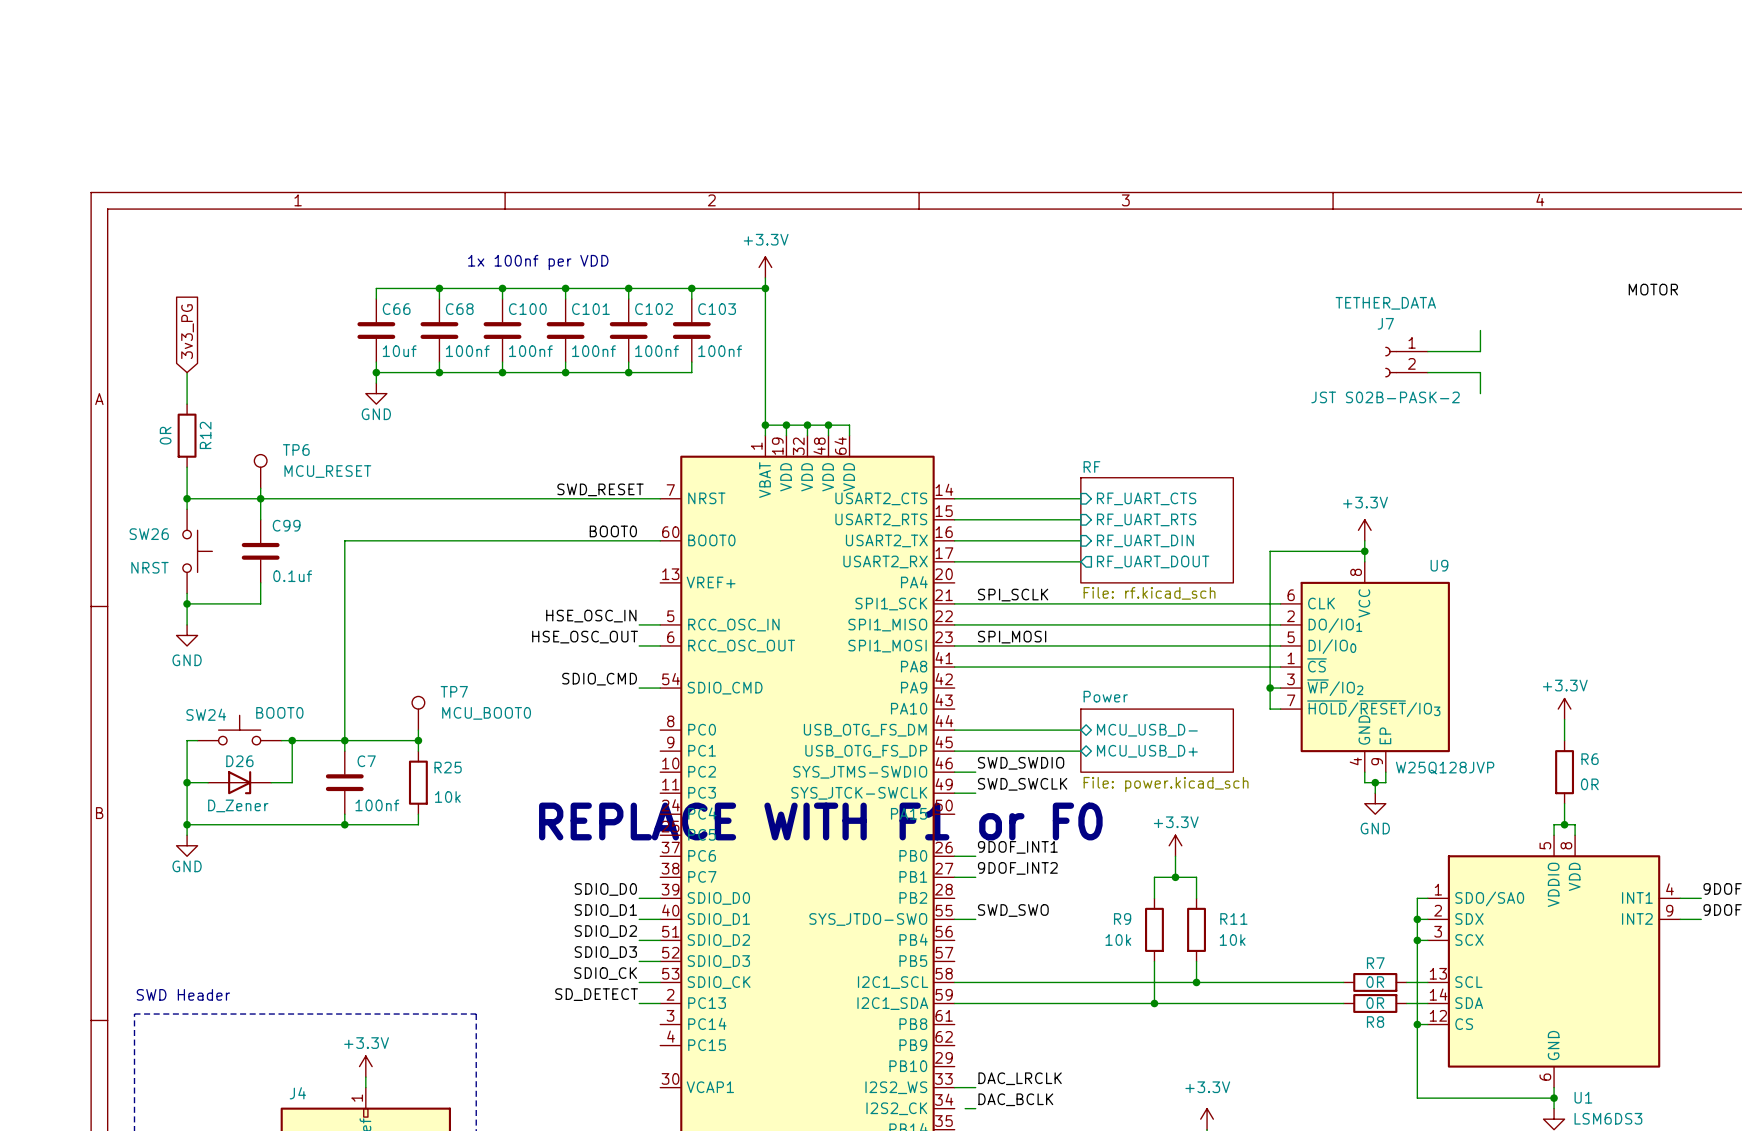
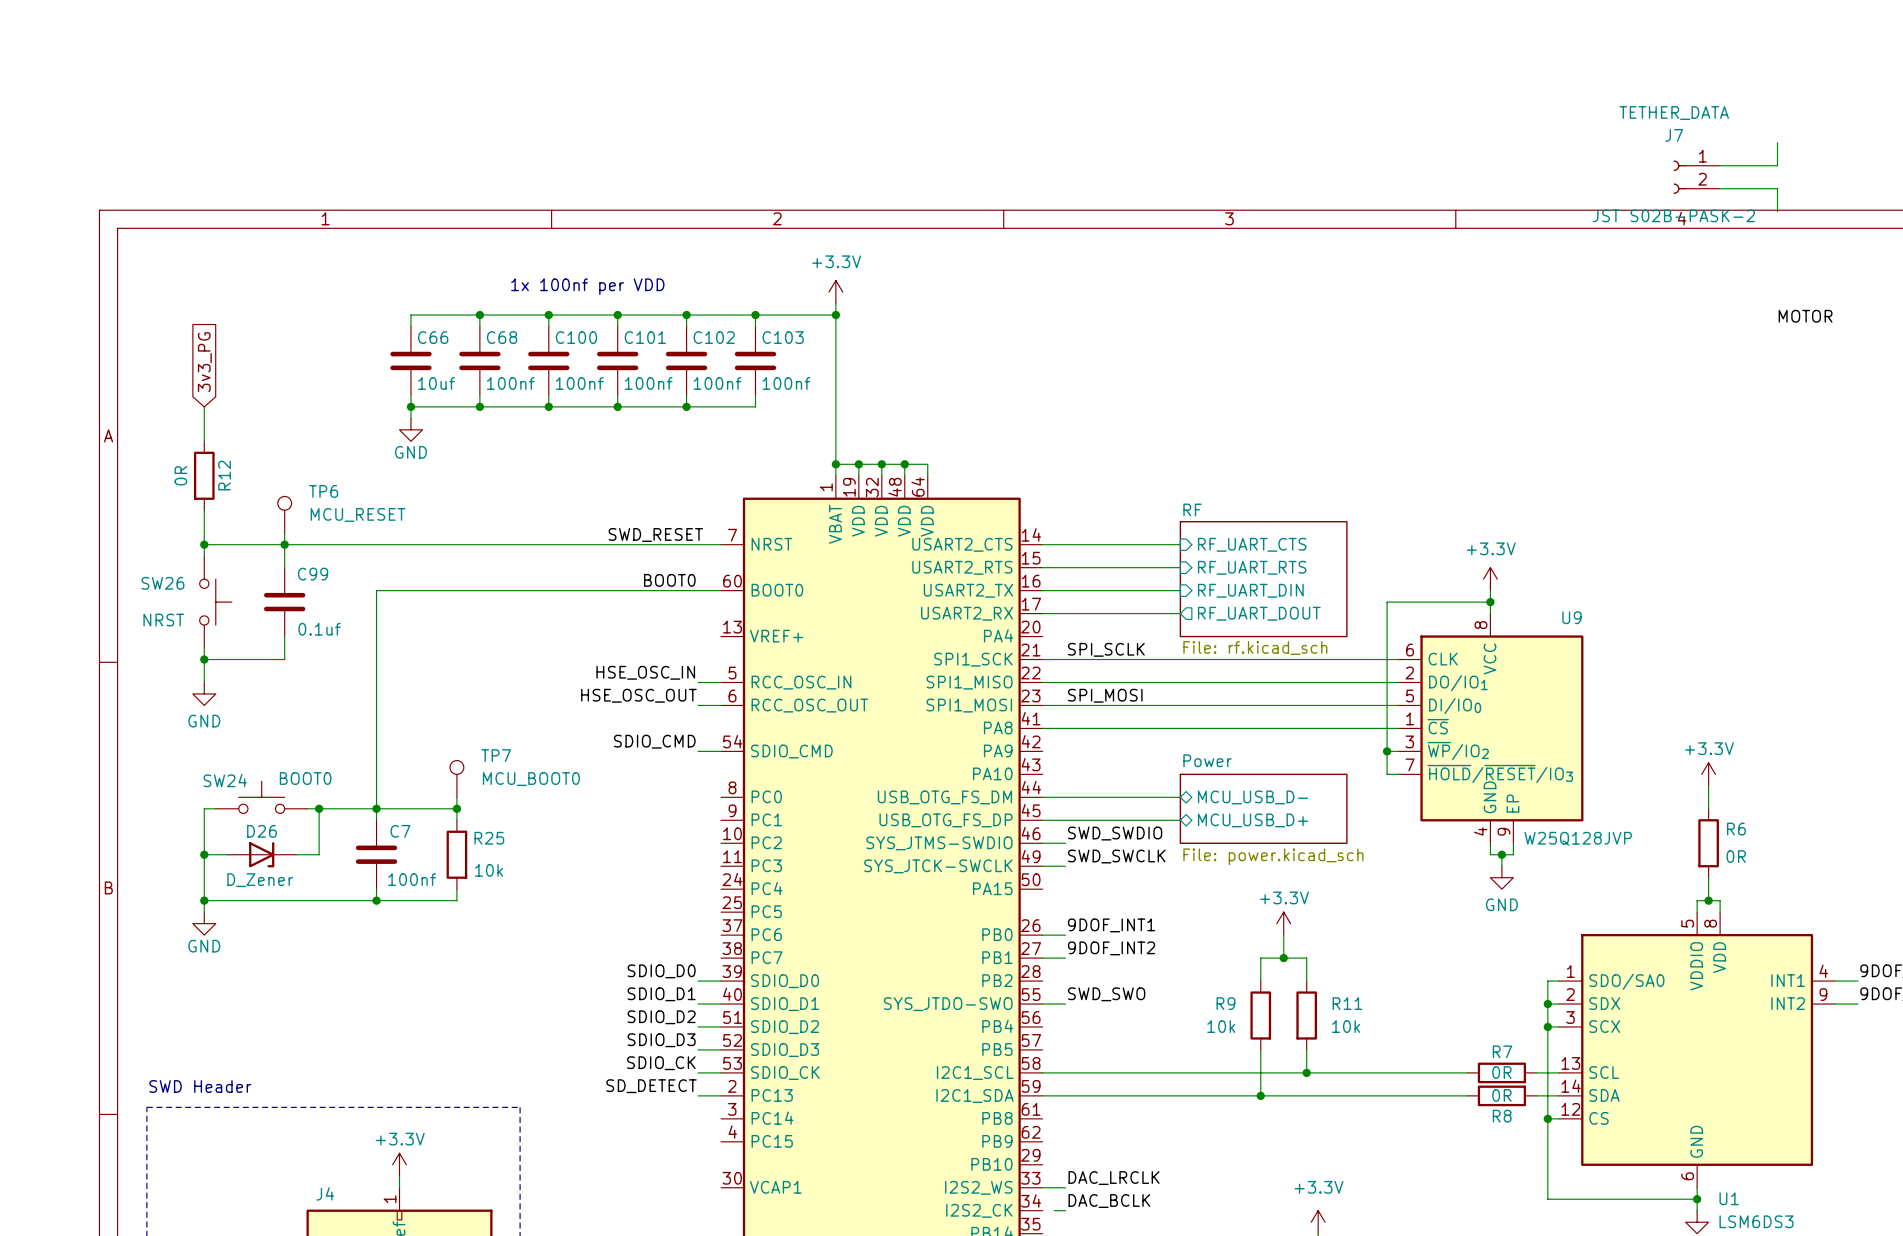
wire: none -> (1777, 142) (1777, 165) (1720, 165)
wire: none -> (1720, 188) (1777, 188) (1777, 211)
wire: (1480, 330) (1480, 351) (1427, 351) -> none
J7 position: (1406, 362) -> (1696, 177)
wire: (1427, 372) (1480, 372) (1480, 393) -> none
text: REPLACE WITH F1 or F0 (820, 821) -> none

